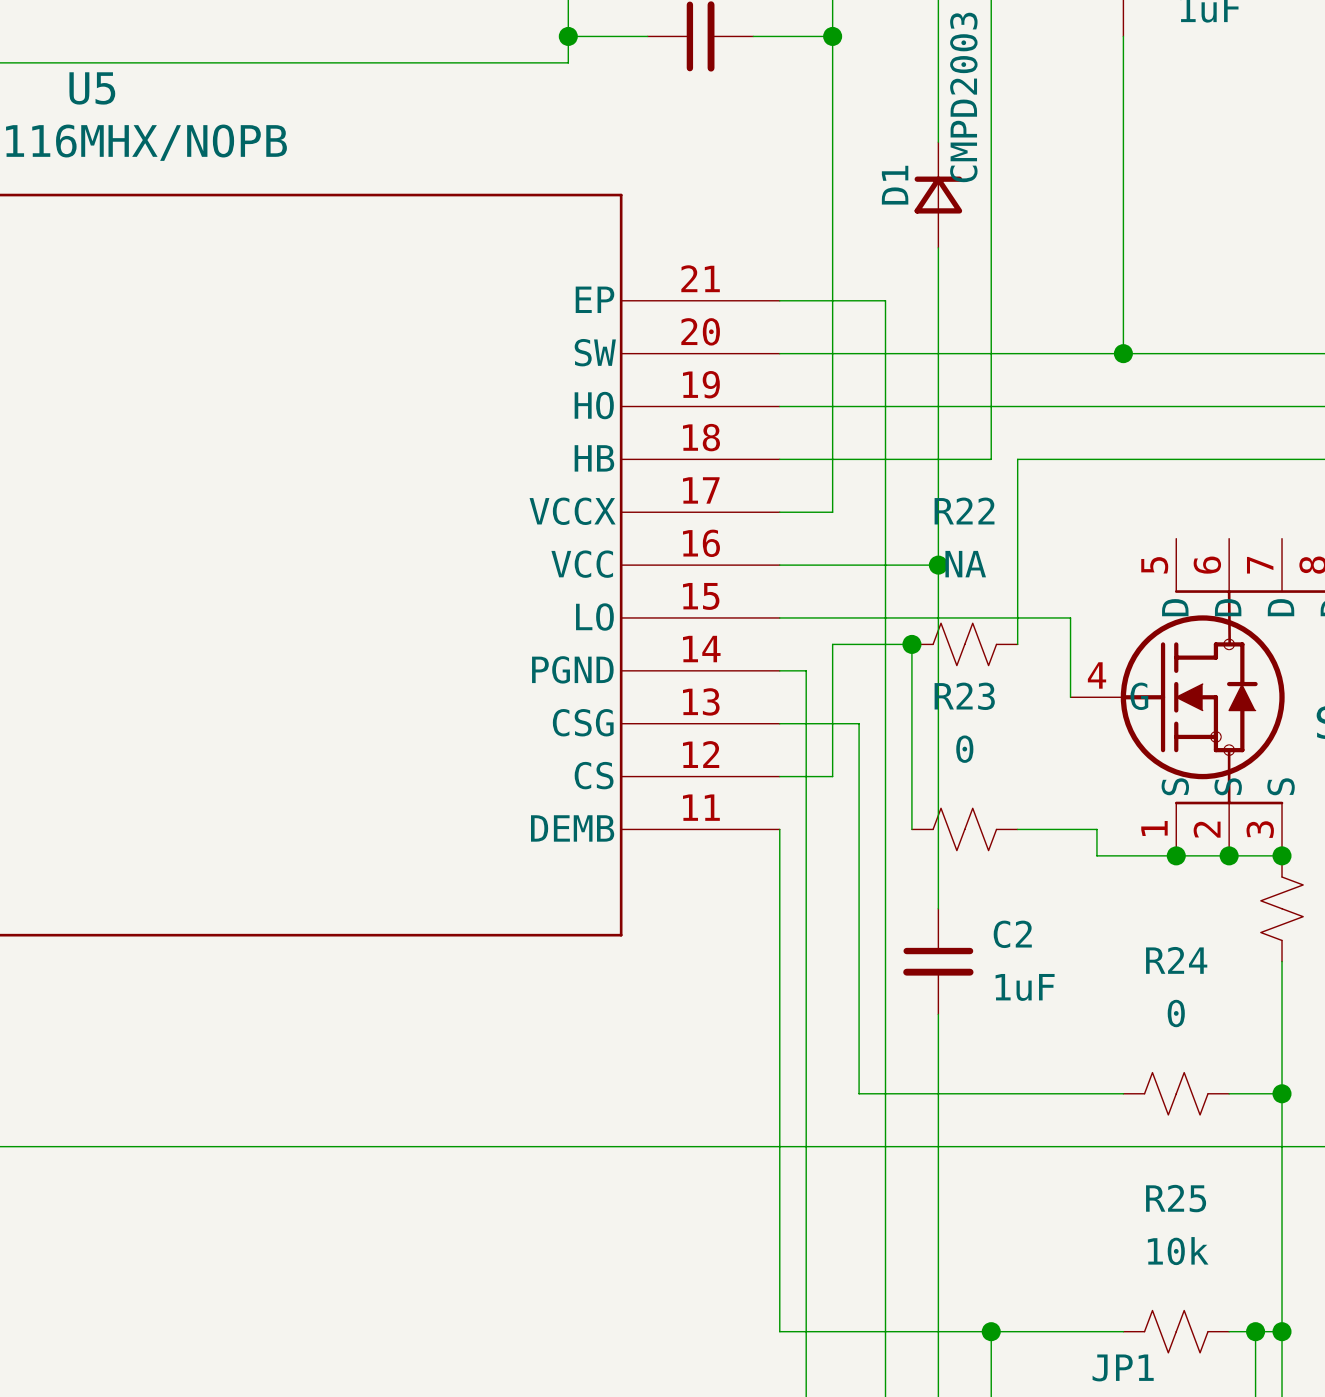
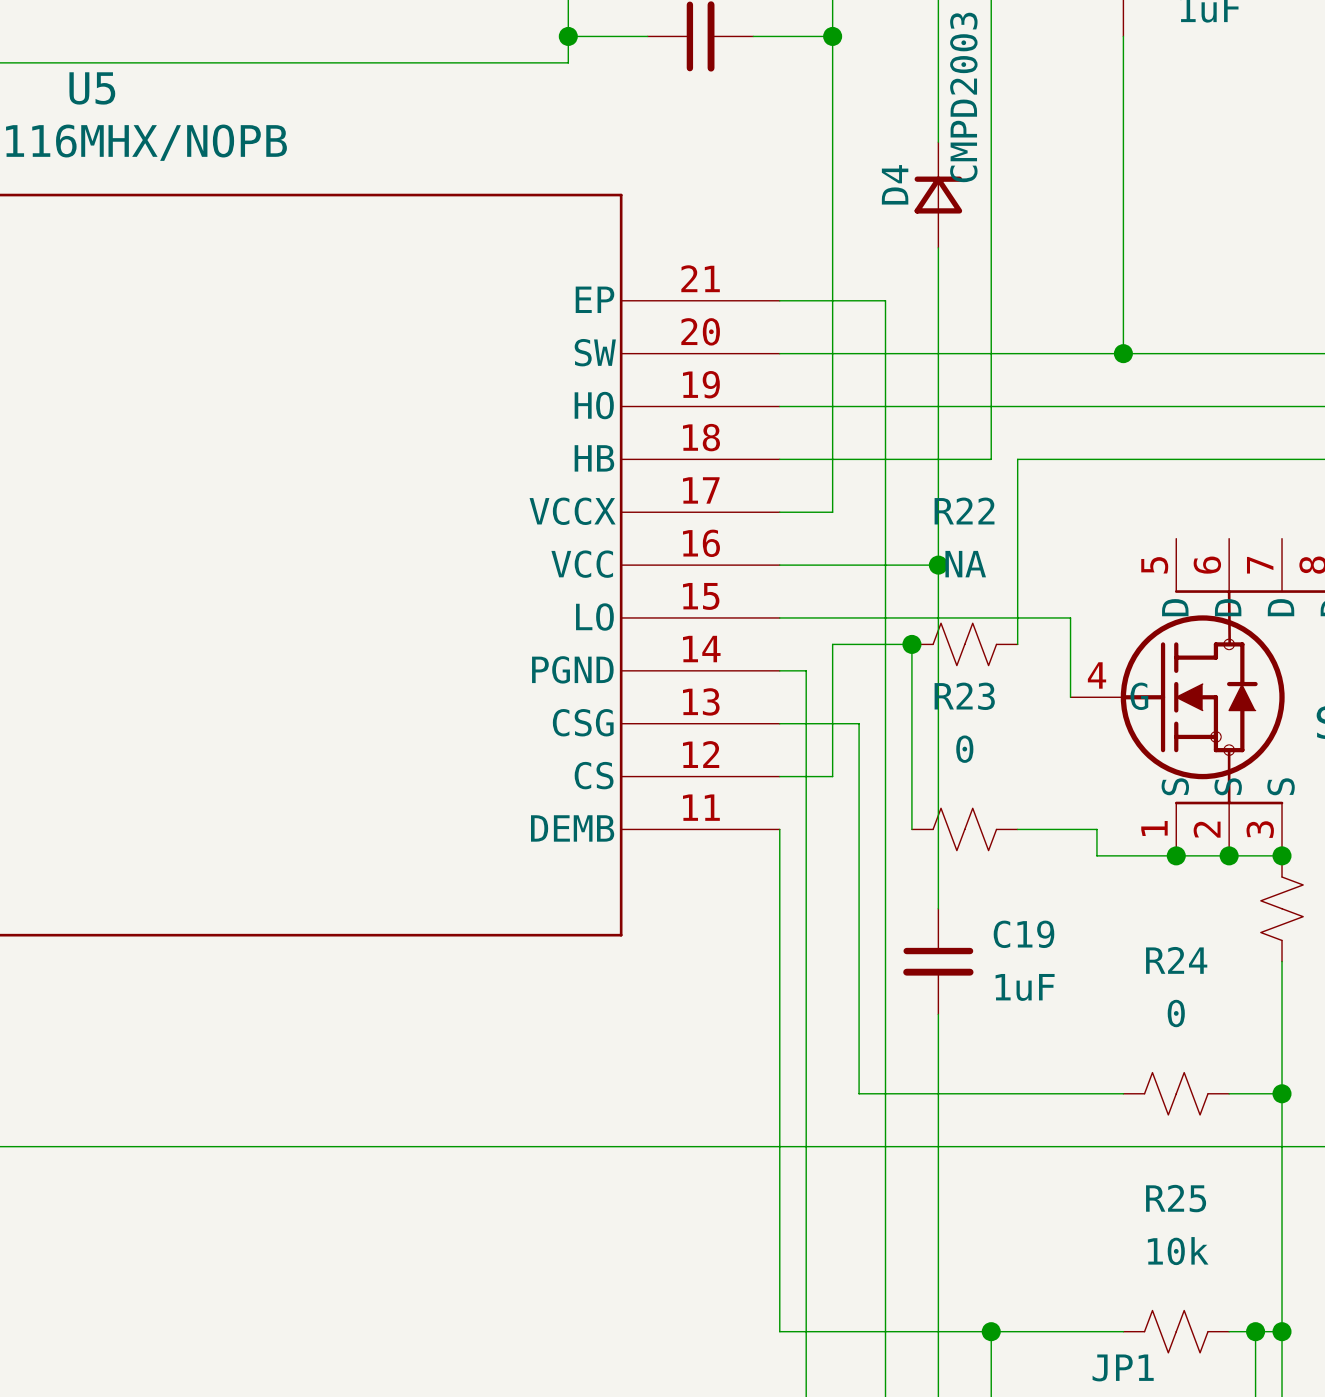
D1 name: D1 (895, 185) -> D4 (895, 184)
C2 name: C2 (1012, 934) -> C19 (1023, 934)

